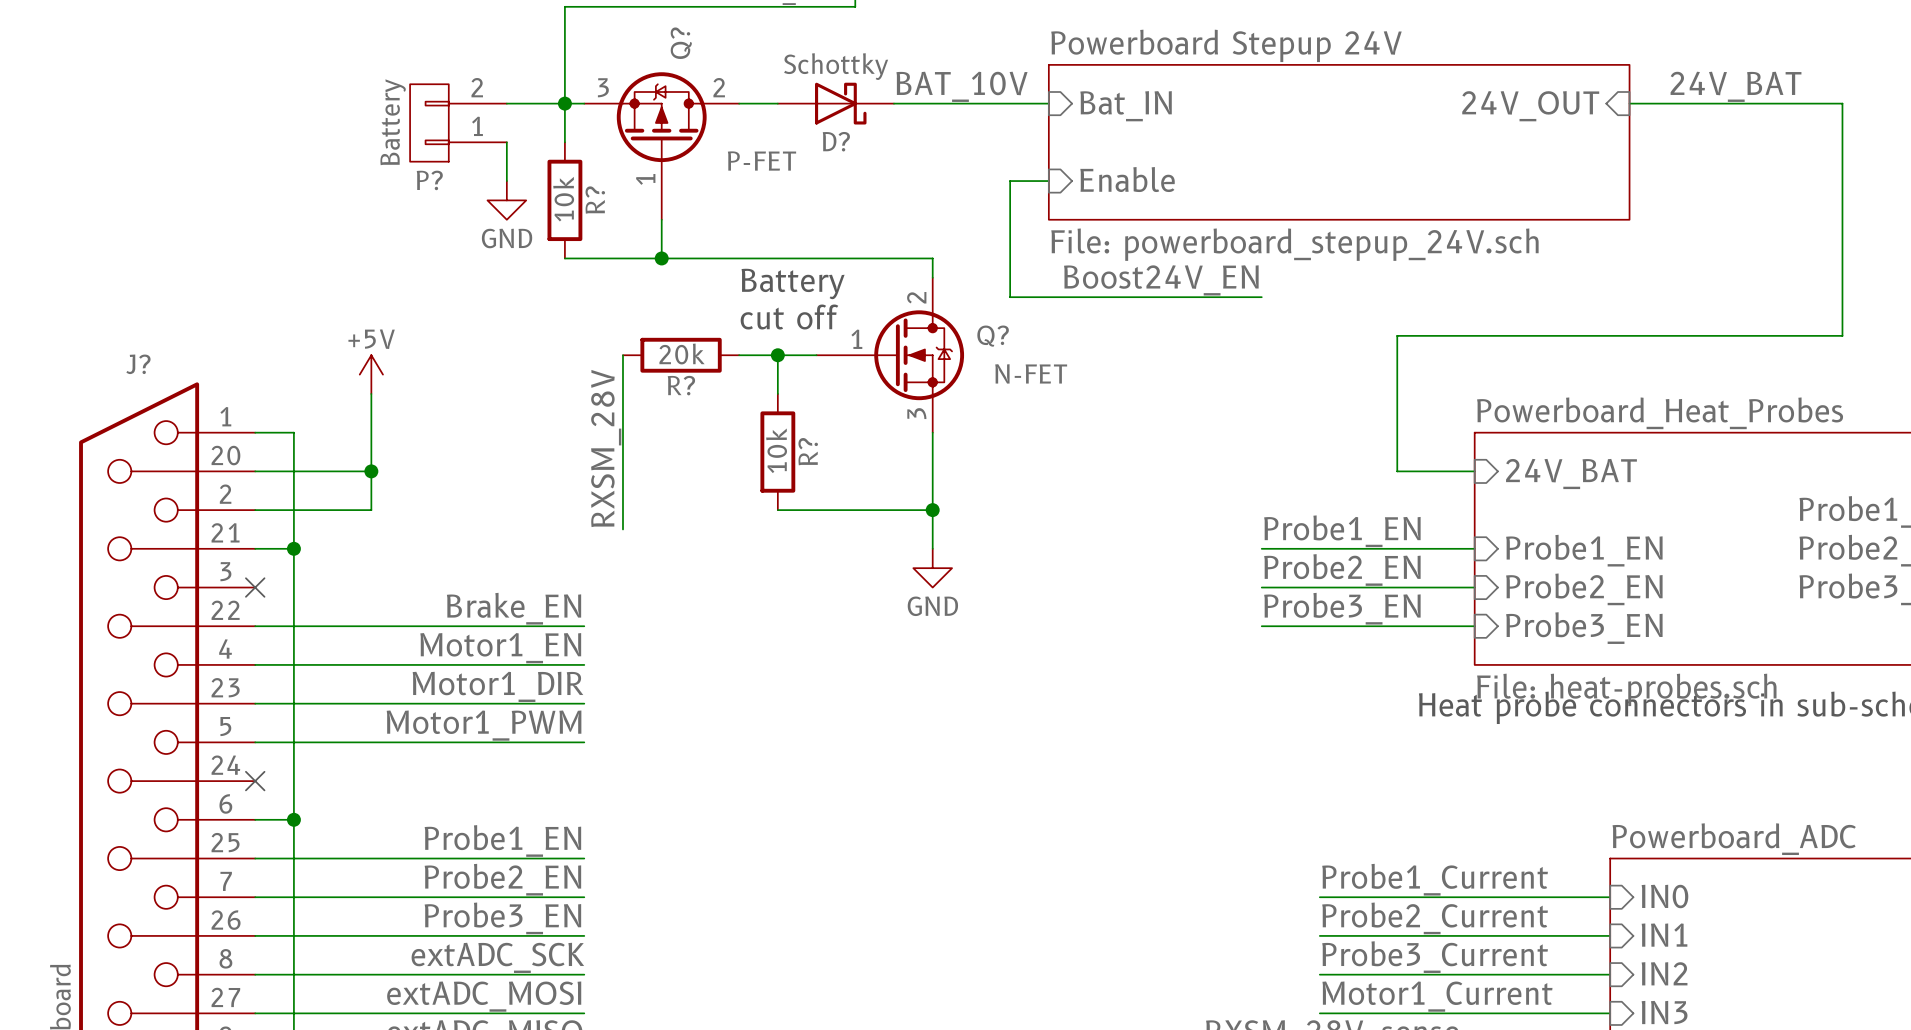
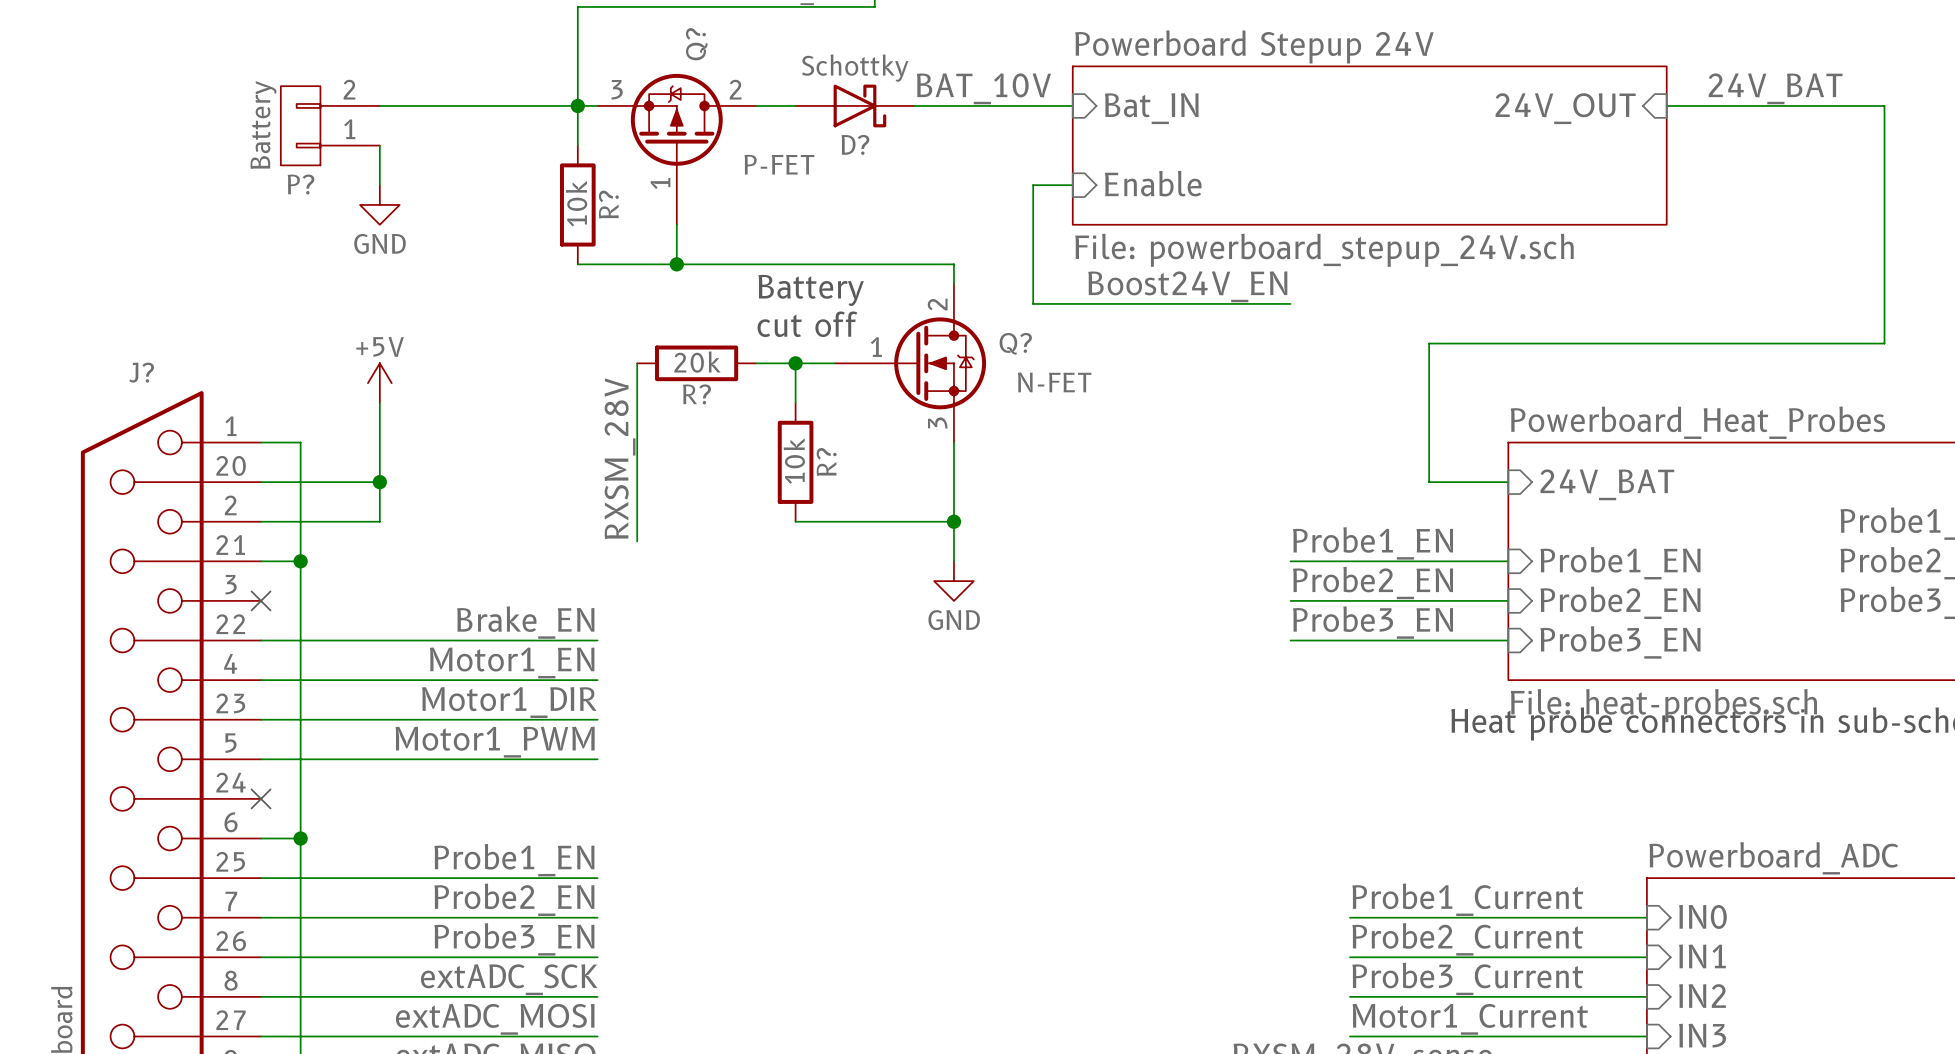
wire: none -> (379, 105) (518, 105)
P? position: (458, 122) -> (330, 125)
wire: (506, 142) (506, 181) -> (379, 145) (379, 185)
power symbol position: GND (506, 200) -> GND (379, 204)

